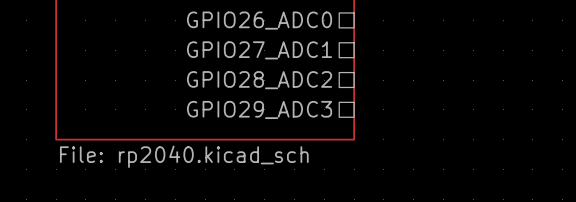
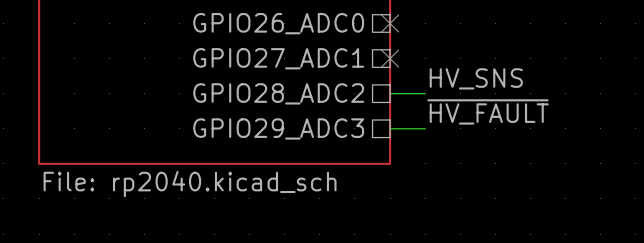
no-connect mark: none -> (390, 23)
no-connect mark: none -> (390, 58)
label: none -> HV_SNS (476, 78)
wire: none -> (390, 93) (425, 93)
label: none -> ~{HV_FAULT} (488, 111)
wire: none -> (390, 128) (425, 128)

